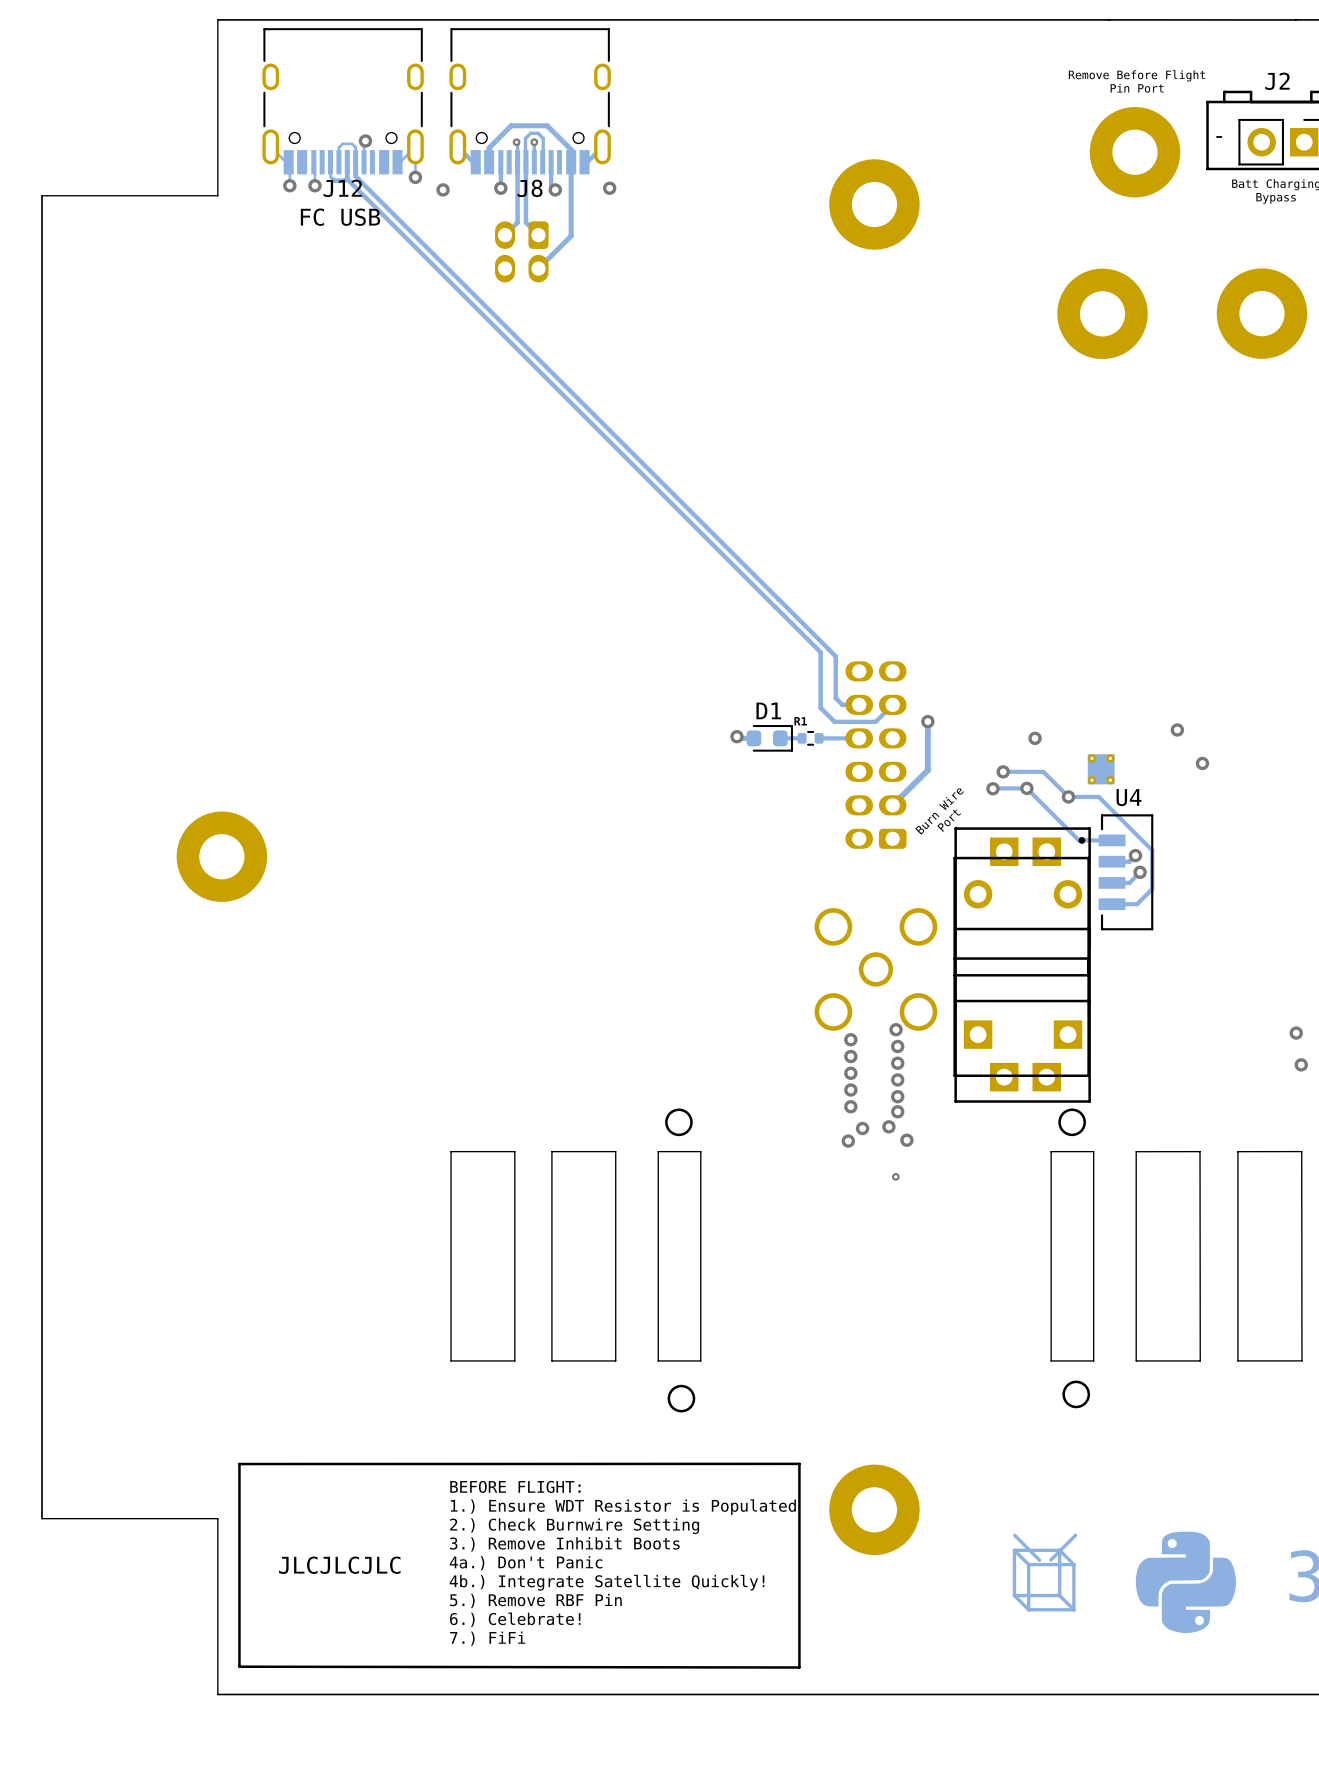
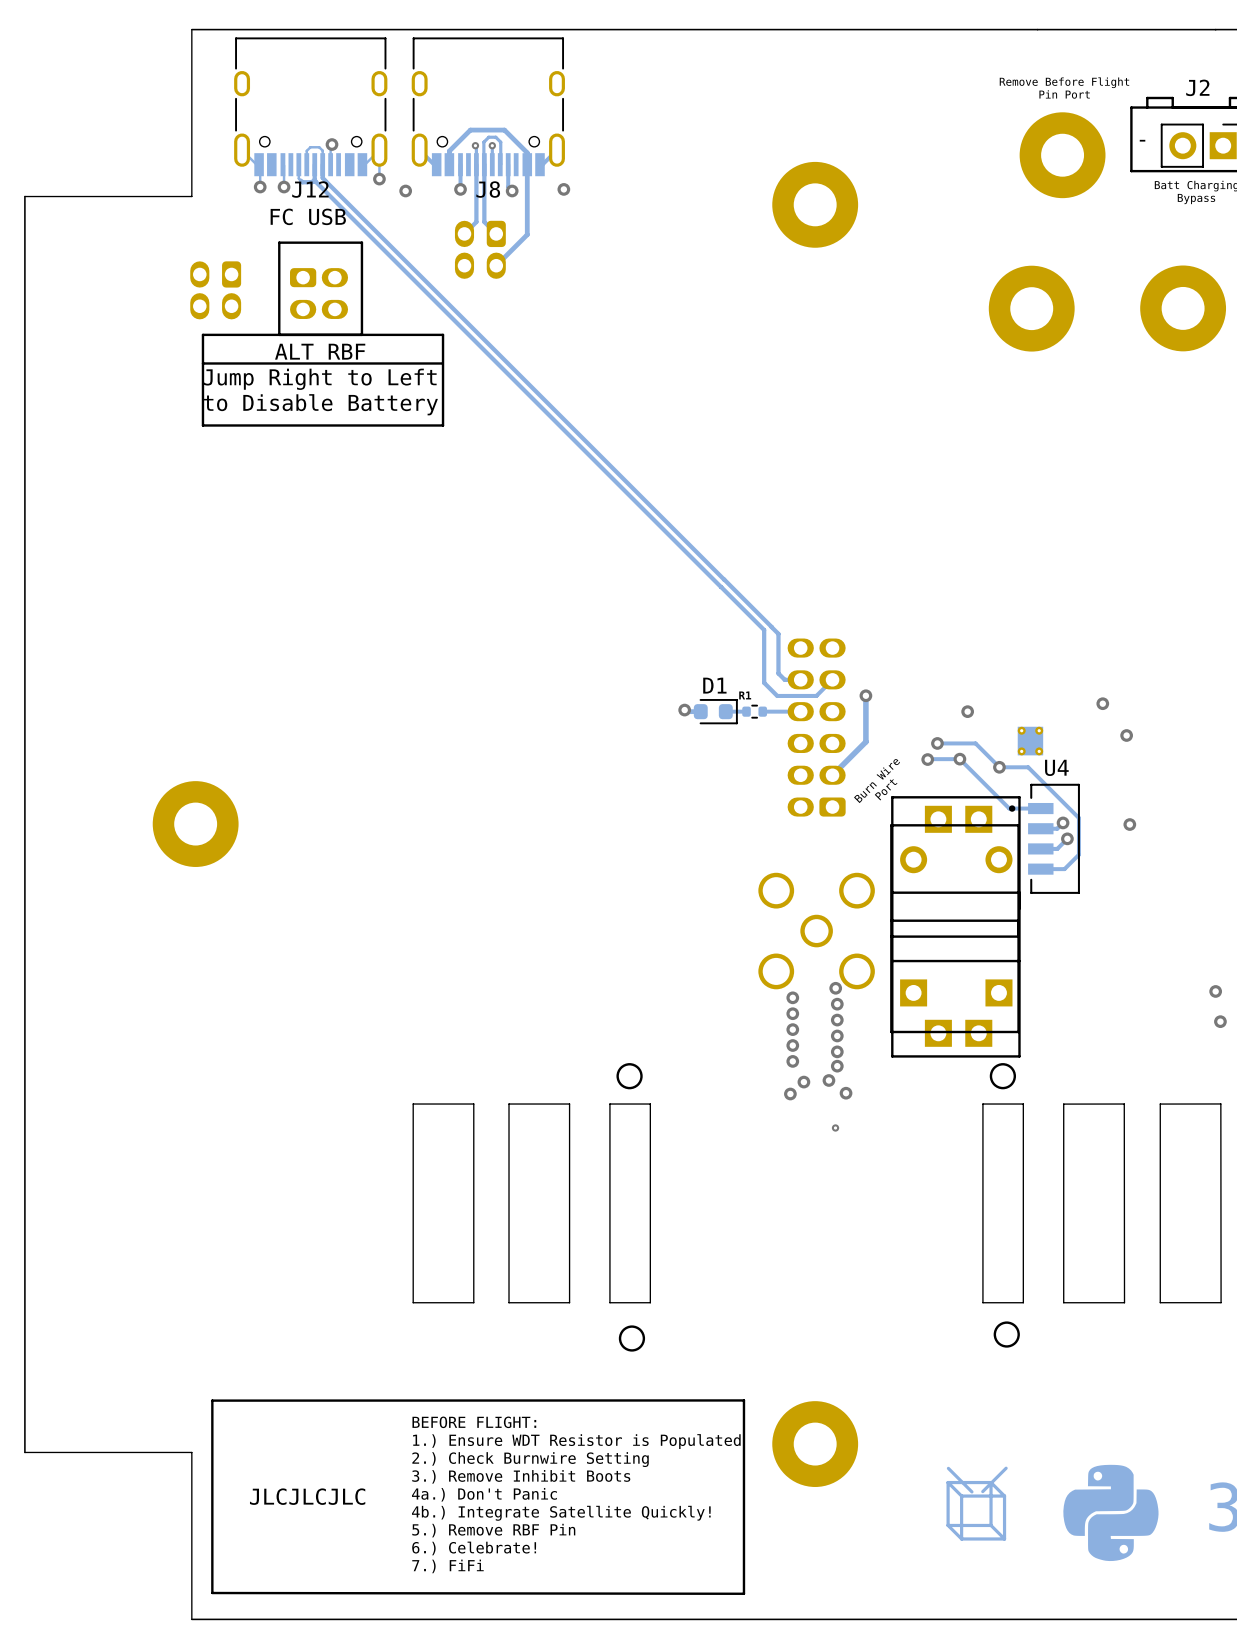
part: none -> (215, 290)
part: none -> (319, 293)
line: none -> (361, 334) (361, 242) (279, 242) (279, 334)
line: none -> (443, 334) (202, 334) (202, 425) (443, 425) (443, 334)
text: none -> ALT RBF (320, 351)
line: none -> (441, 363) (202, 363)
text: none -> Jump Right to Left (320, 379)
text: none -> to Disable Battery (320, 404)
via: none -> (1129, 824)

